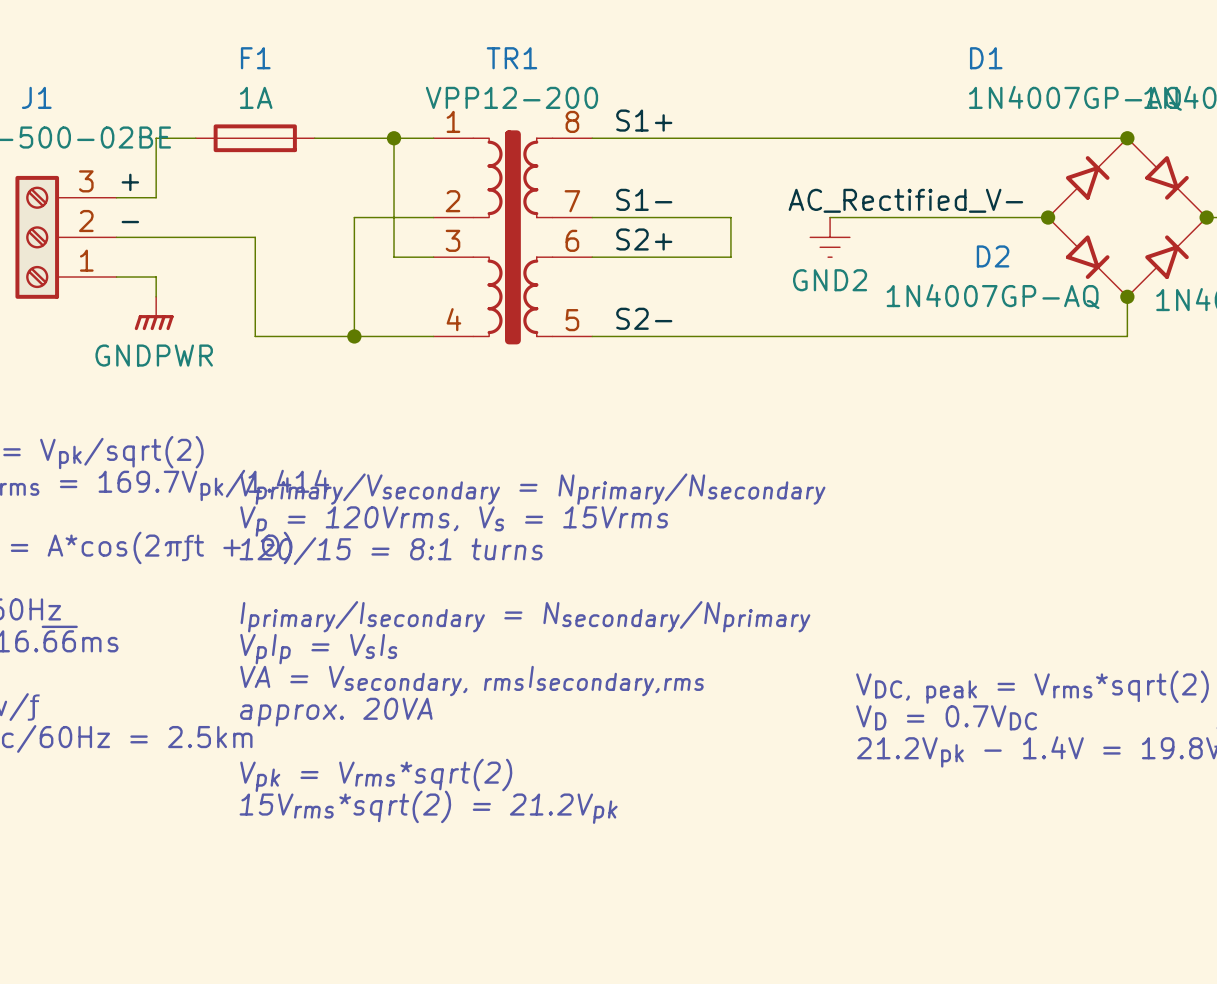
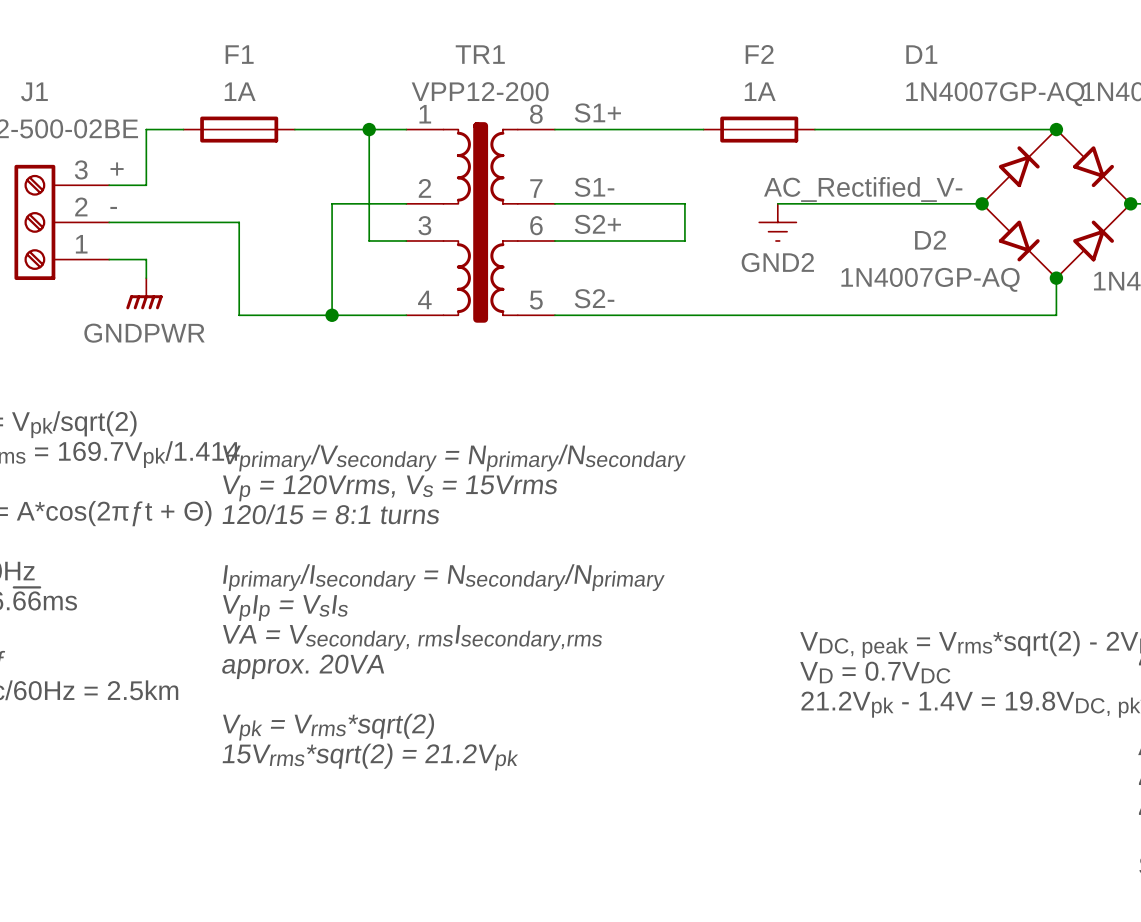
F2: none -> 1A (759, 129)

